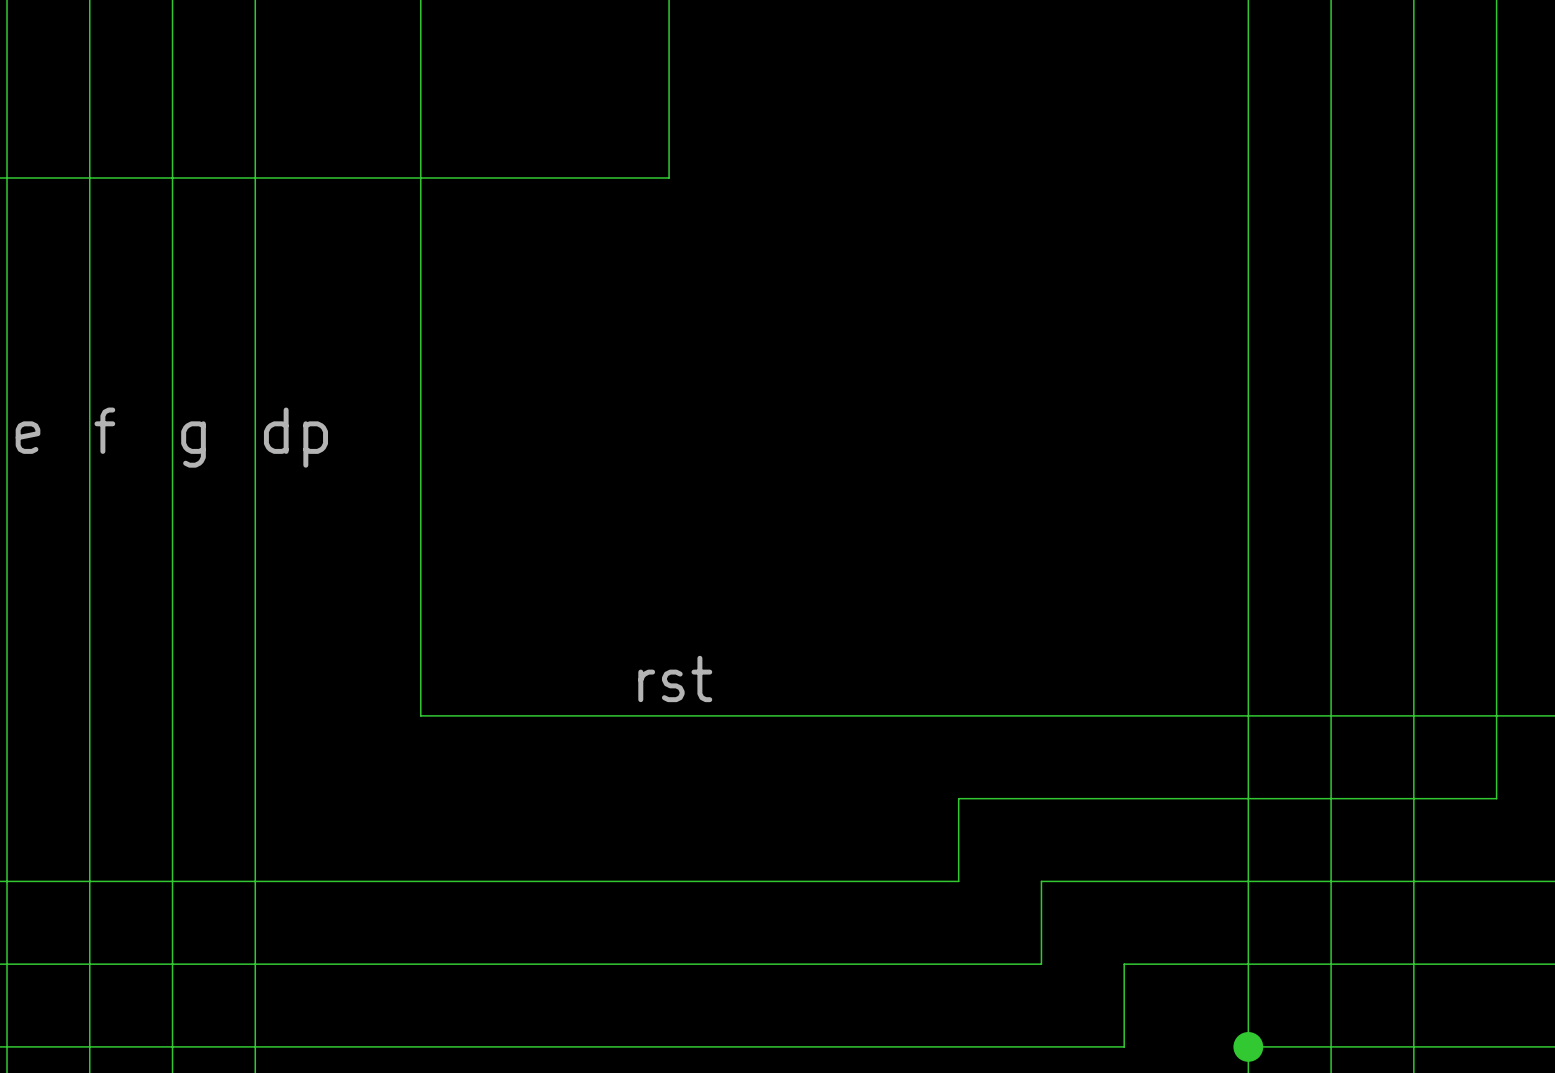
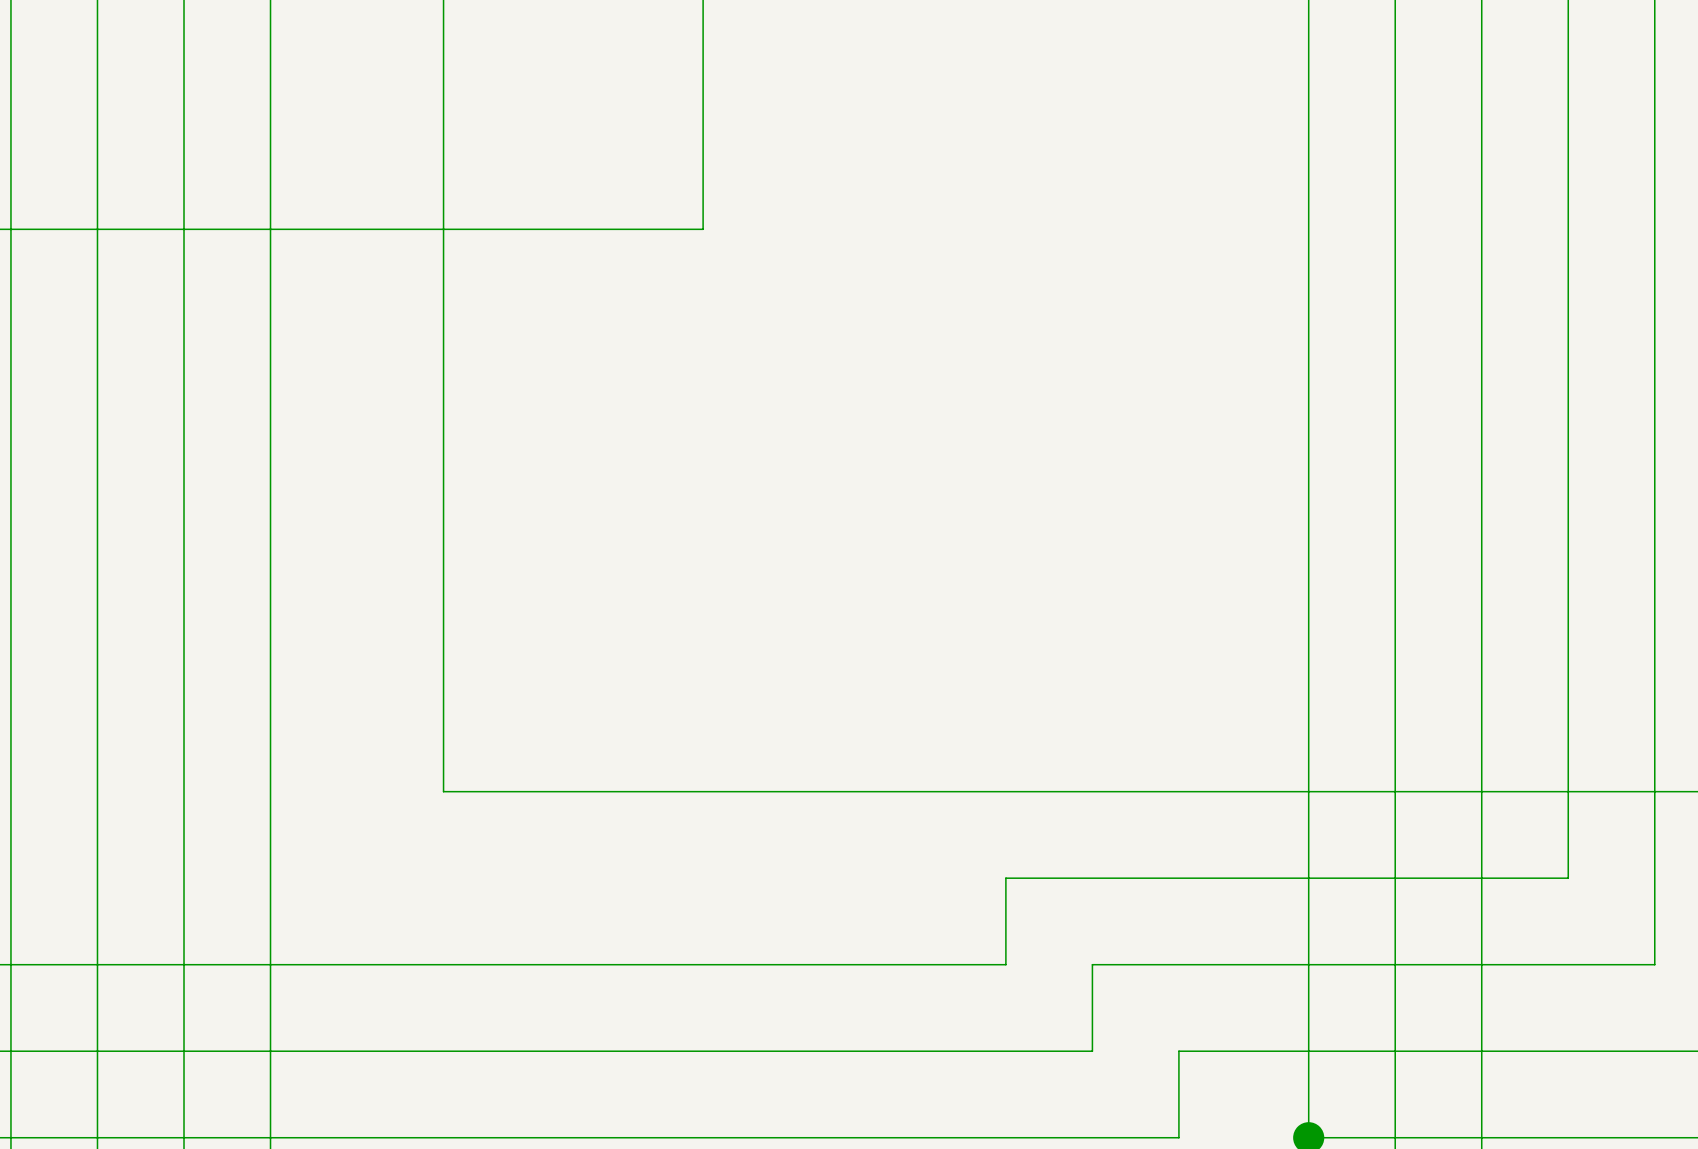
label: f (104, 430) -> none
label: e (28, 437) -> none
label: dp (295, 437) -> none
label: g (193, 444) -> none
label: rst (675, 678) -> none

